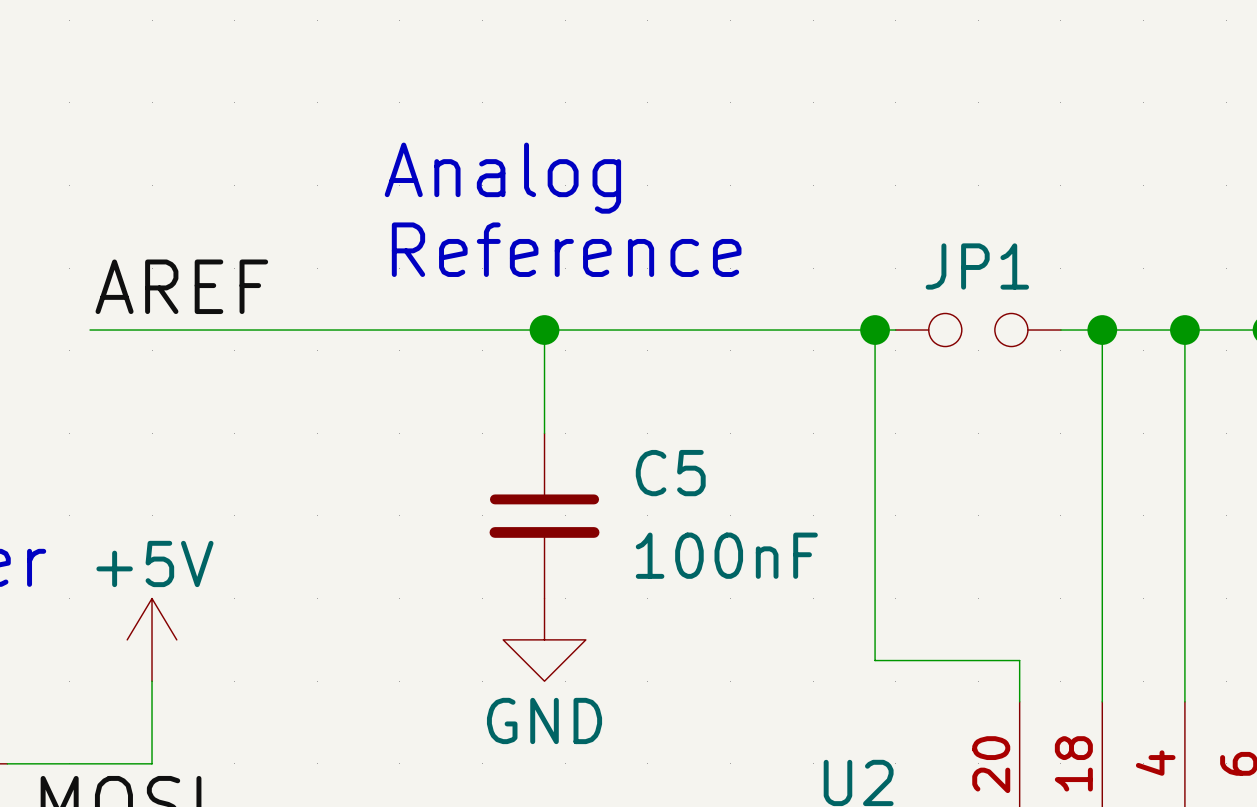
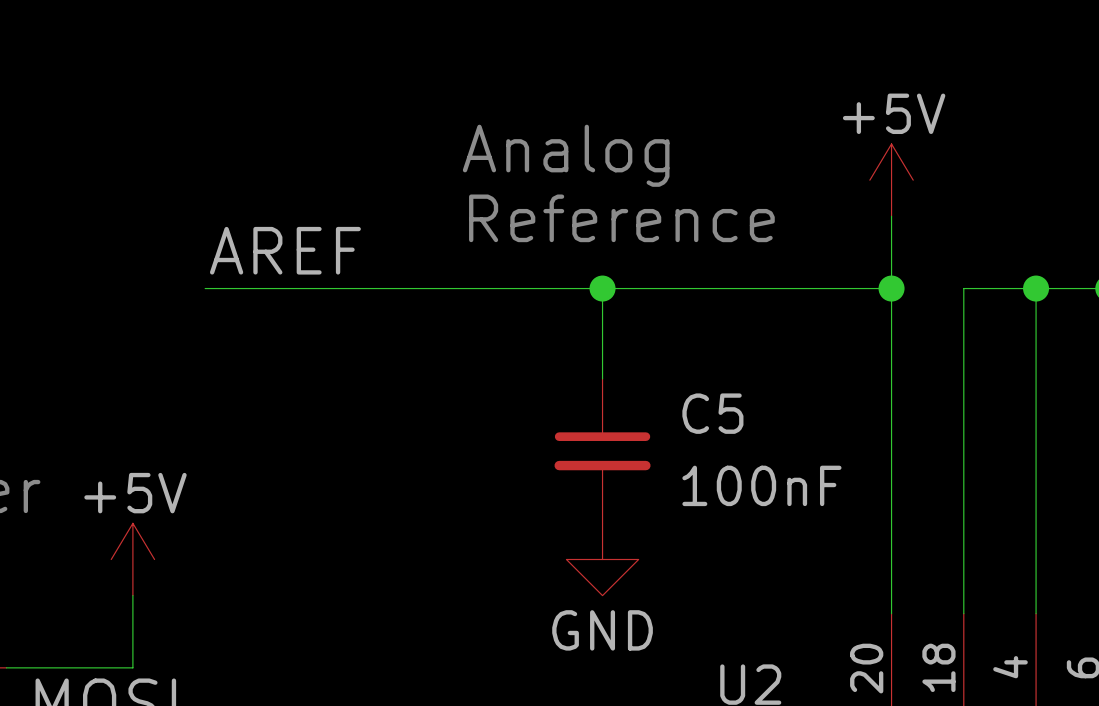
text position: Analog (502, 178) -> Analog (566, 155)
power symbol: none -> +5V (891, 180)
text position: Reference (566, 249) -> Reference (621, 218)
label position: AREF (181, 286) -> AREF (285, 250)
wire: (90, 330) (234, 330) -> none
wire: (544, 330) (544, 433) -> (602, 288) (602, 378)
junction: (544, 330) -> none
junction: none -> (602, 288)
wire: (875, 330) (875, 660) (1019, 660) -> (891, 216) (891, 577)
junction: (875, 330) -> none
wire: none -> (783, 288) (891, 288)
JP1: (978, 330) -> none
junction: none -> (891, 288)
wire: (1060, 330) (1102, 330) -> none
junction: (1102, 330) -> none
C5 position: (544, 515) -> (602, 451)
power symbol position: GND (544, 639) -> GND (602, 559)

